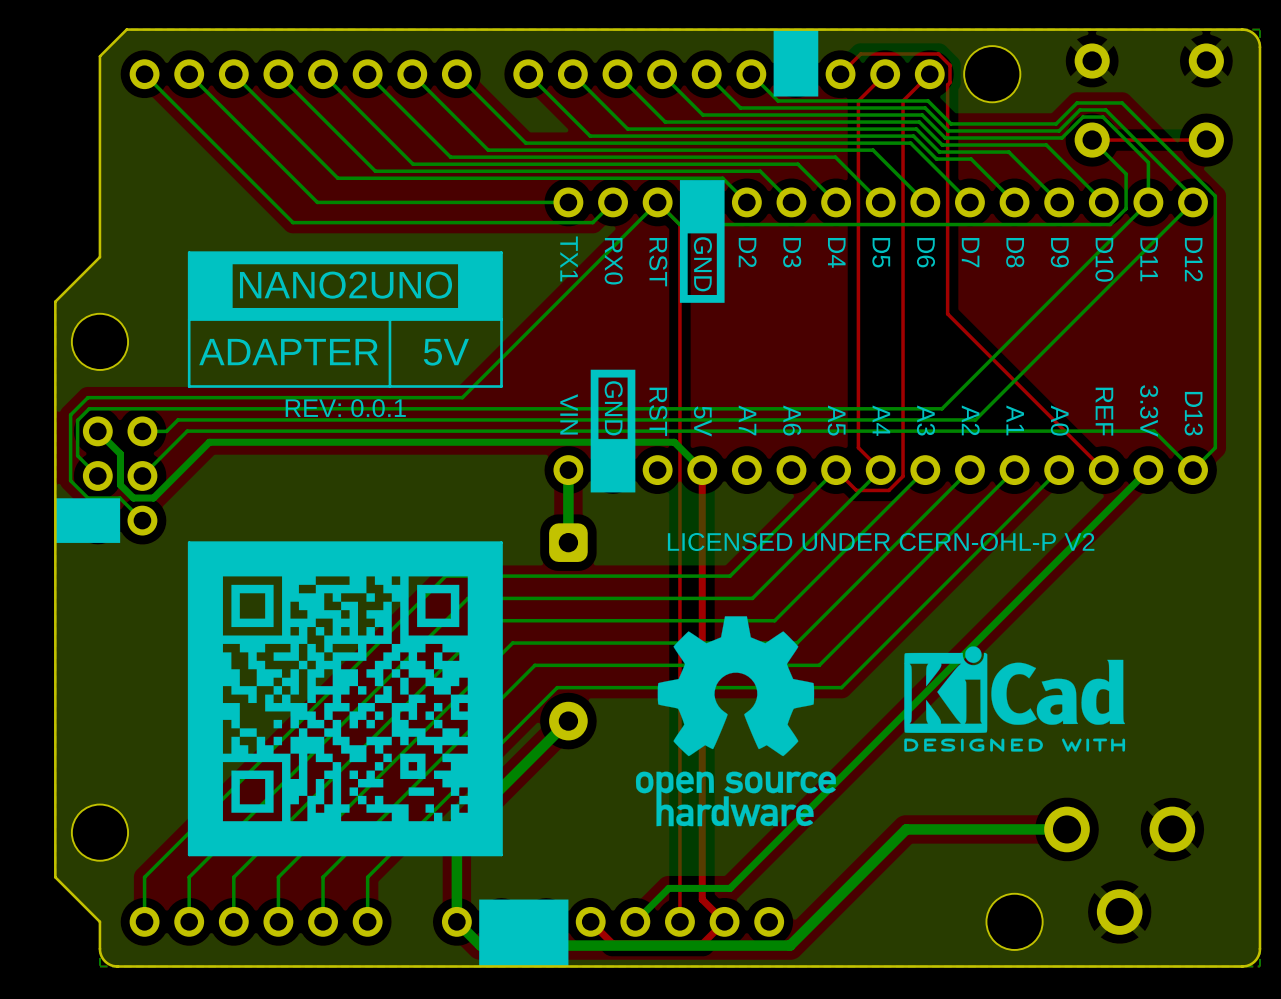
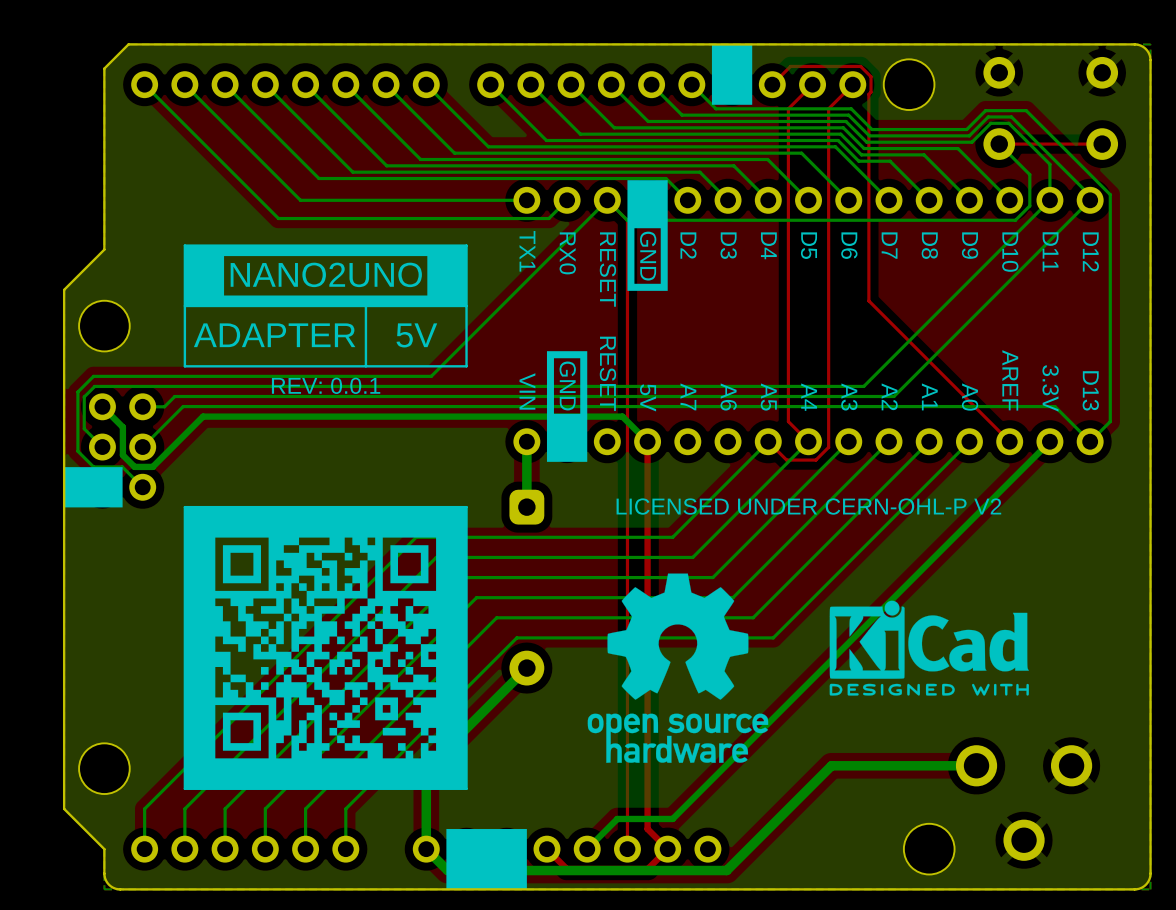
part text: RST (658, 262) -> RESET (607, 269)
part text: RST (658, 411) -> RESET (607, 373)
part text: REF (1104, 411) -> AREF (1010, 380)

